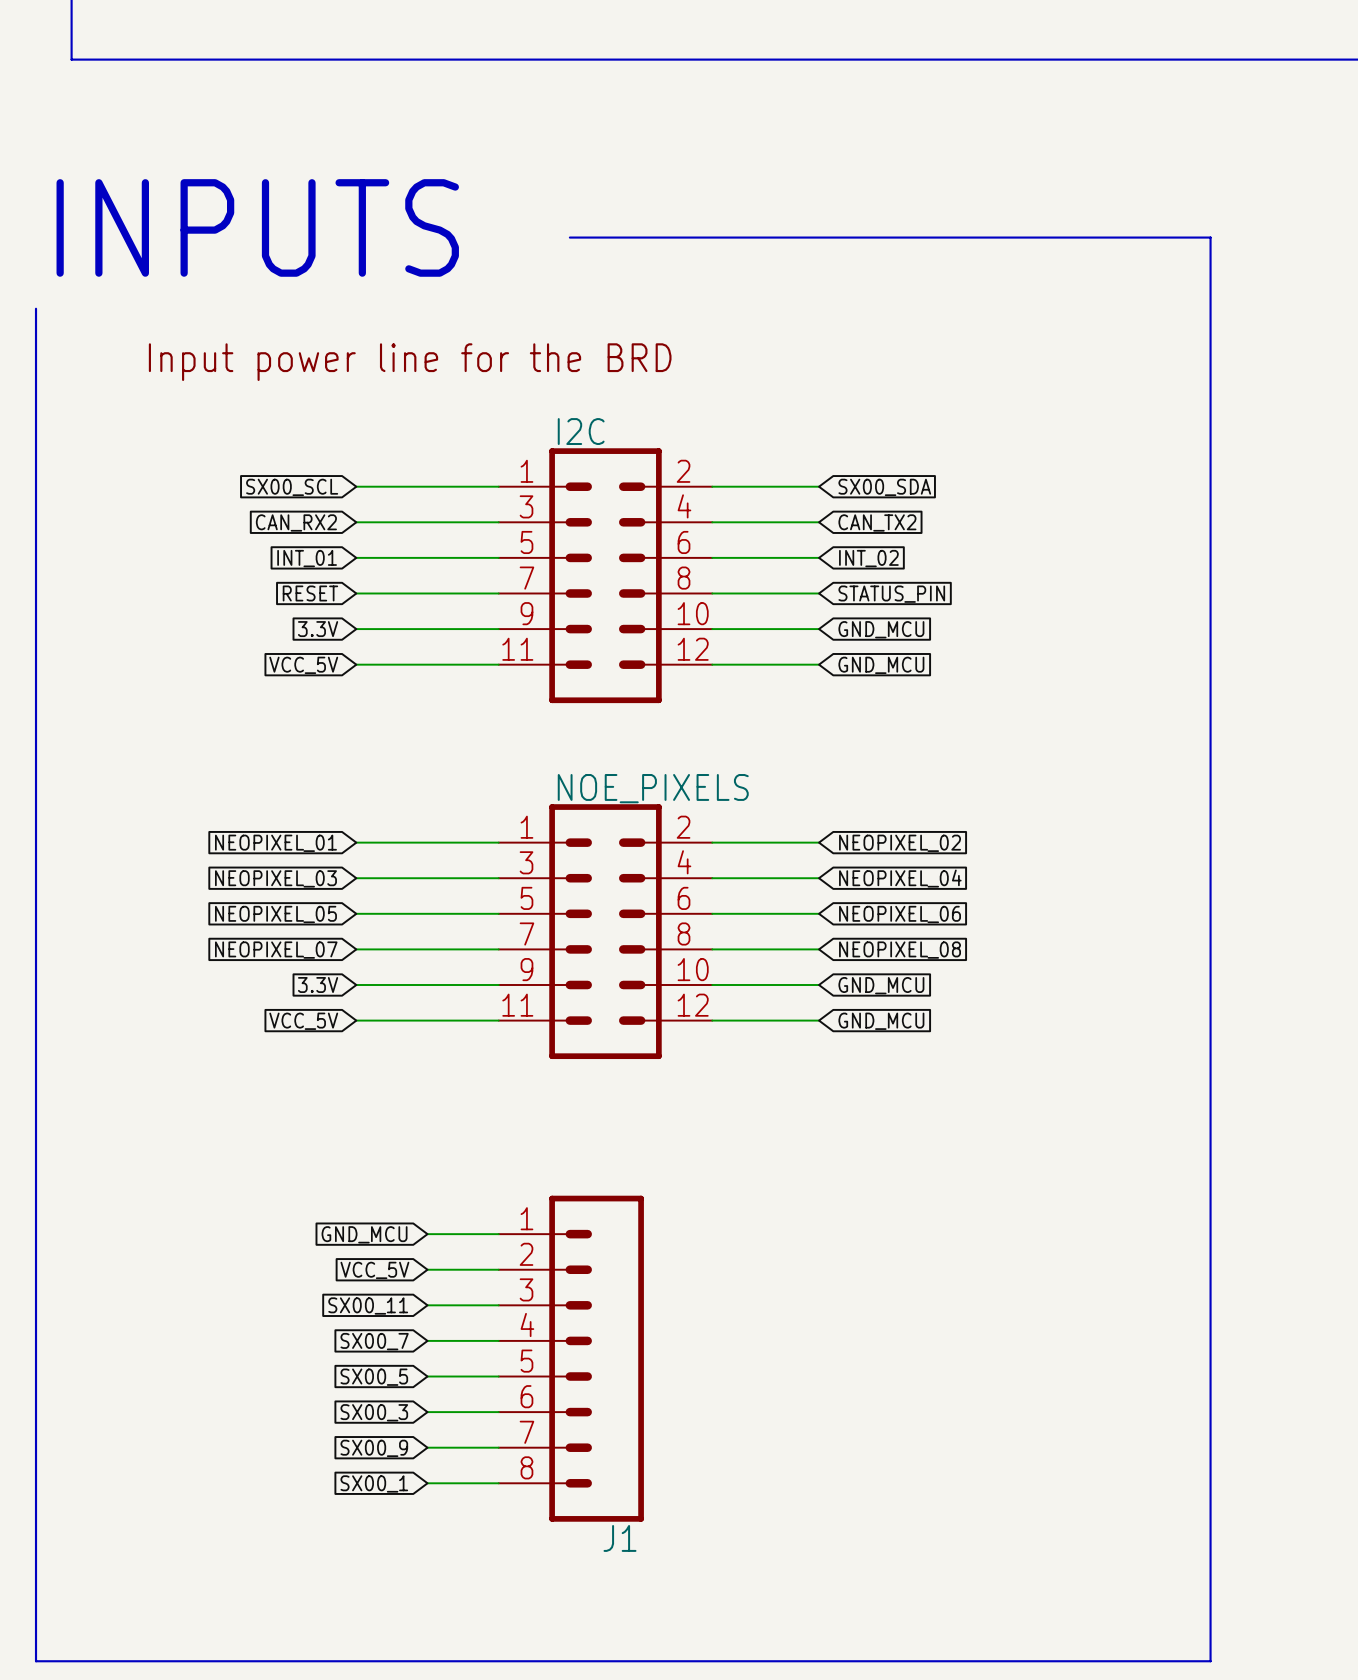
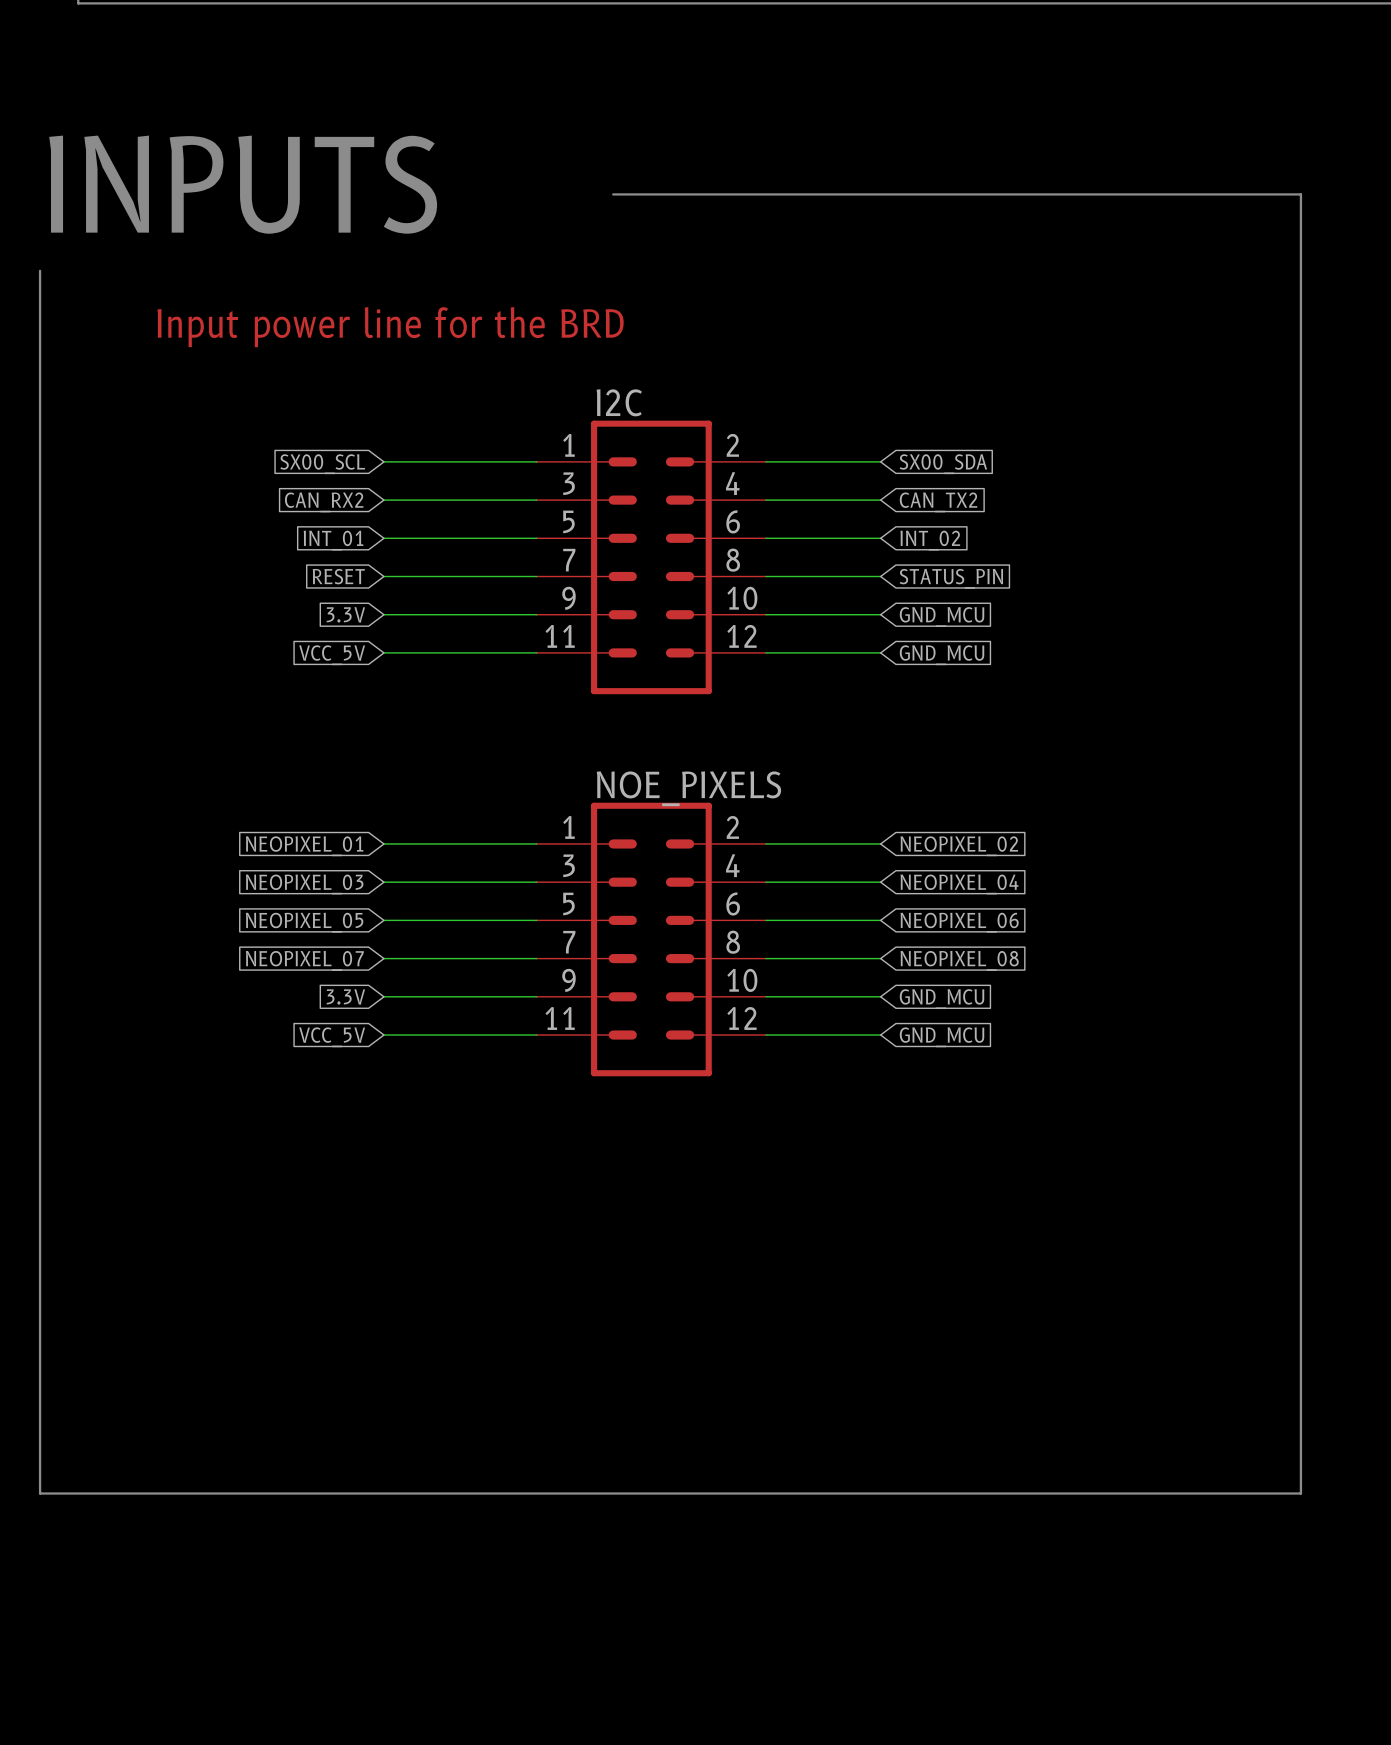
global label: GND_MCU (364, 1234) -> none
wire: (427, 1234) (498, 1234) -> none
wire: (427, 1269) (498, 1269) -> none
global label: VCC_5V (374, 1270) -> none
wire: (427, 1305) (498, 1305) -> none
global label: SX00_11 (368, 1306) -> none
wire: (427, 1340) (498, 1340) -> none
global label: SX00_7 (374, 1341) -> none
J1: (571, 1358) -> none
wire: (427, 1376) (498, 1376) -> none
global label: SX00_5 (374, 1377) -> none
global label: SX00_3 (374, 1412) -> none
wire: (427, 1412) (498, 1412) -> none
line: (36, 1447) (36, 1661) (1210, 1661) (1210, 1447) -> (40, 1493) (1300, 1493)
global label: SX00_9 (374, 1448) -> none
global label: SX00_1 (374, 1483) -> none
wire: (427, 1483) (498, 1483) -> none

